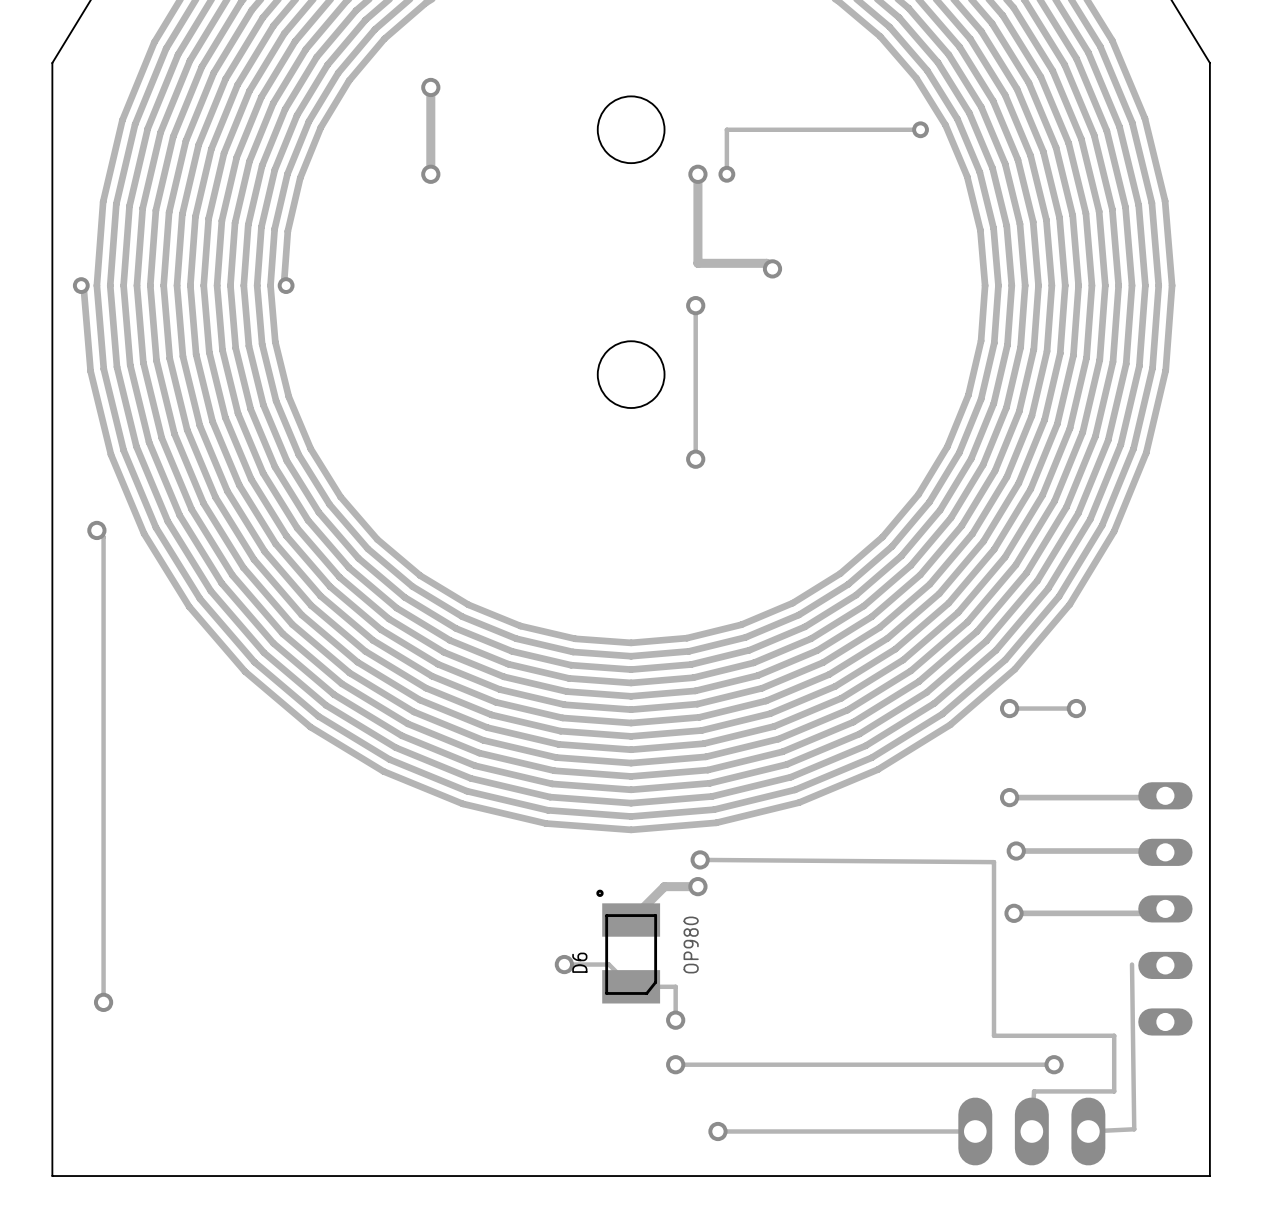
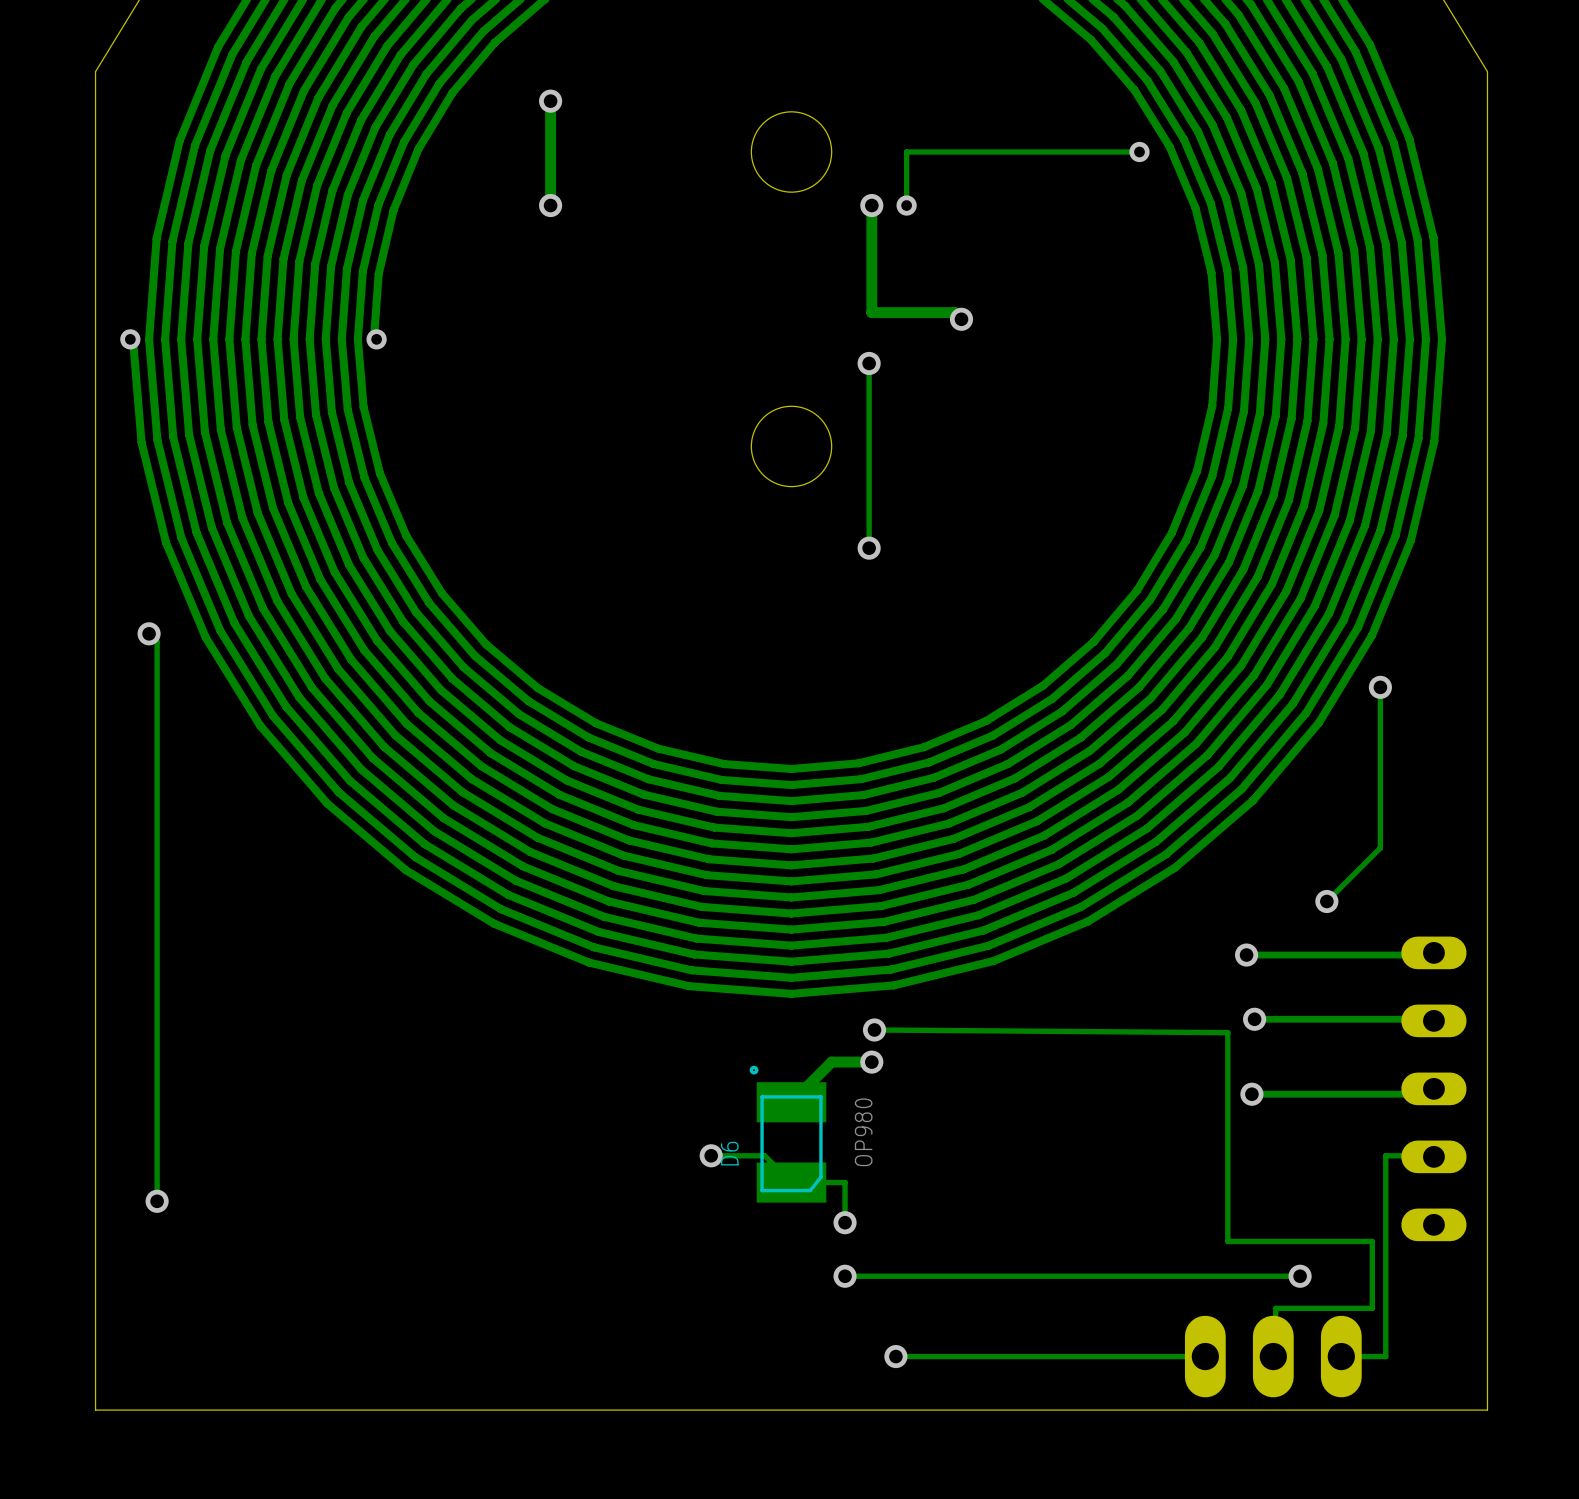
track: none -> (1380, 687) (1380, 847) (1326, 901)
via: none -> (1380, 687)
via: (1009, 708) -> none
track: (1076, 708) (1009, 708) -> none
via: (1076, 708) -> none
via: none -> (1326, 901)
track: (1132, 964) (1134, 1129) (1088, 1131) -> (1433, 1156) (1385, 1155) (1385, 1356) (1341, 1356)

